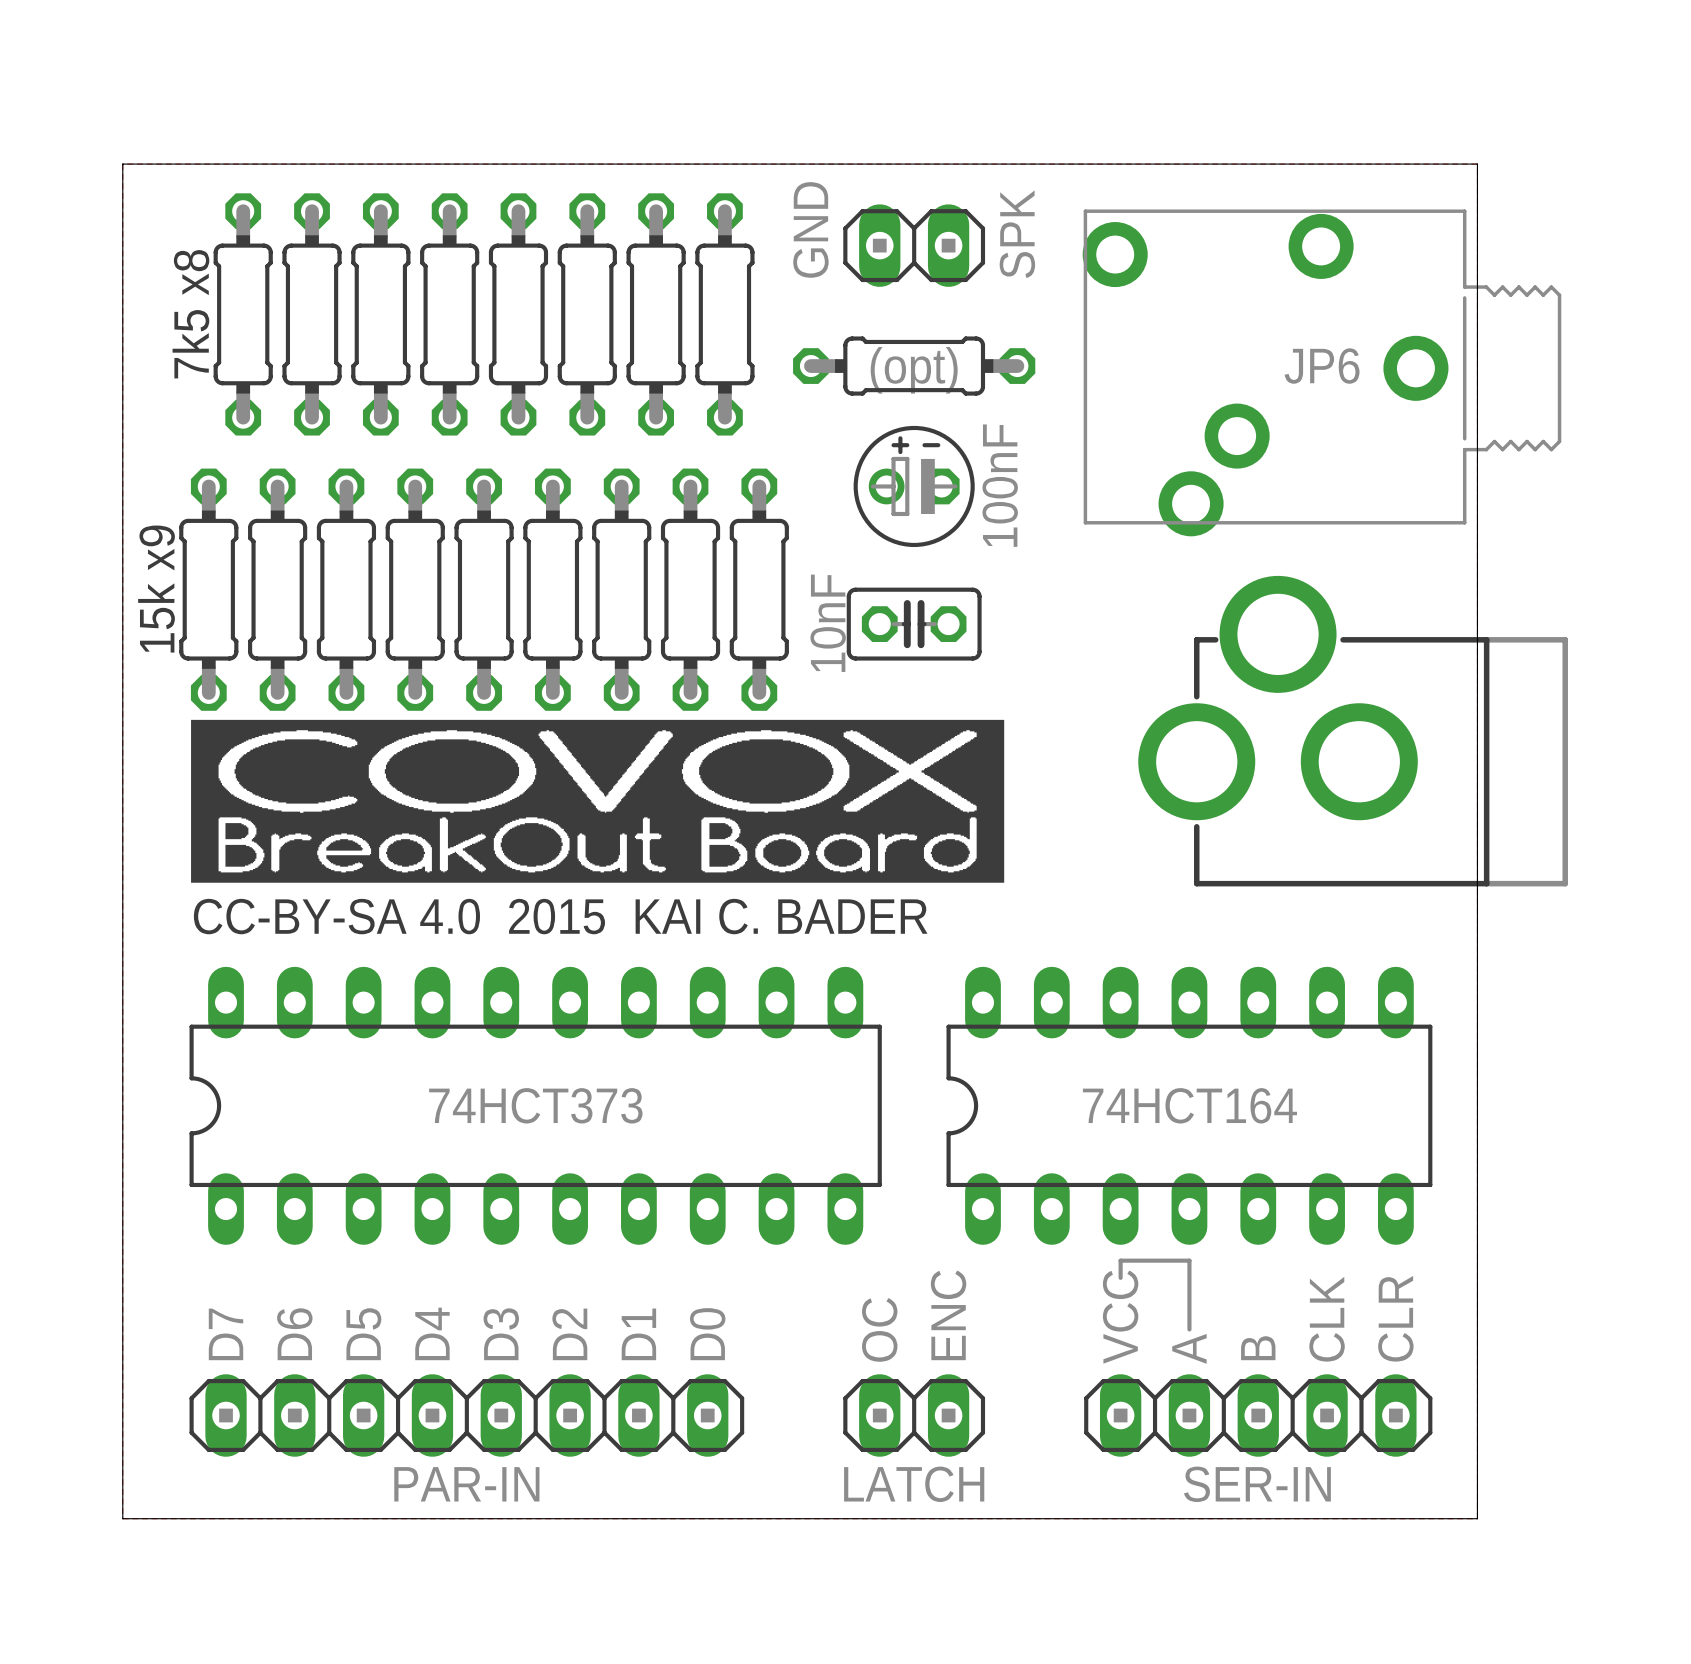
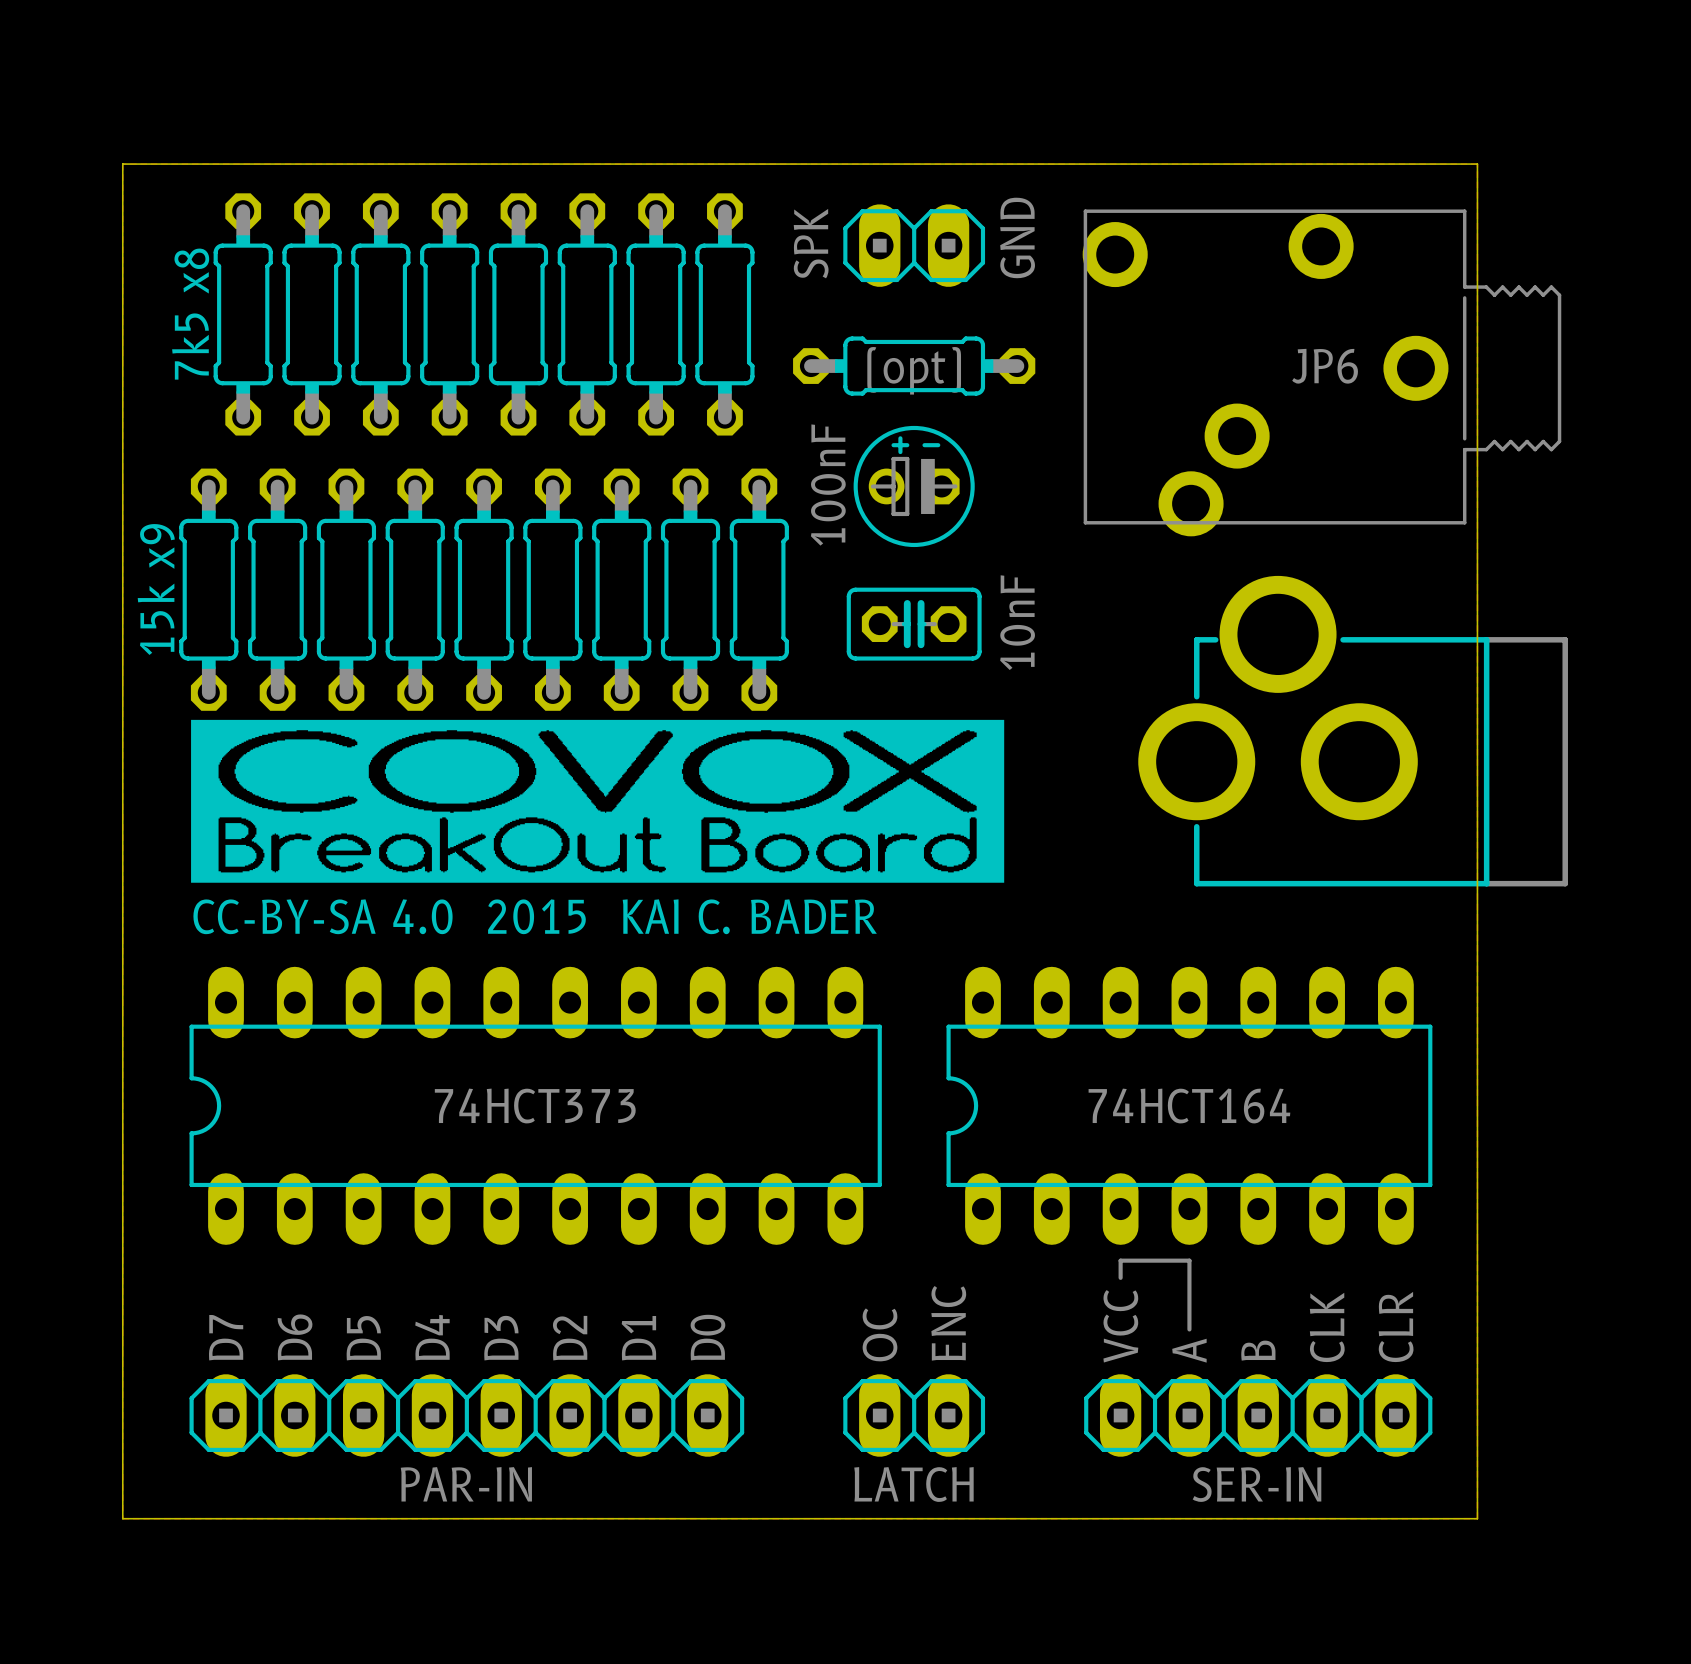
text: GND (810, 229) -> SPK (811, 243)
text: SPK (1017, 234) -> GND (1017, 237)
part value position: 100nF (1000, 485) -> 100nF (828, 485)
part value position: 10nF (828, 623) -> 10nF (1017, 622)

